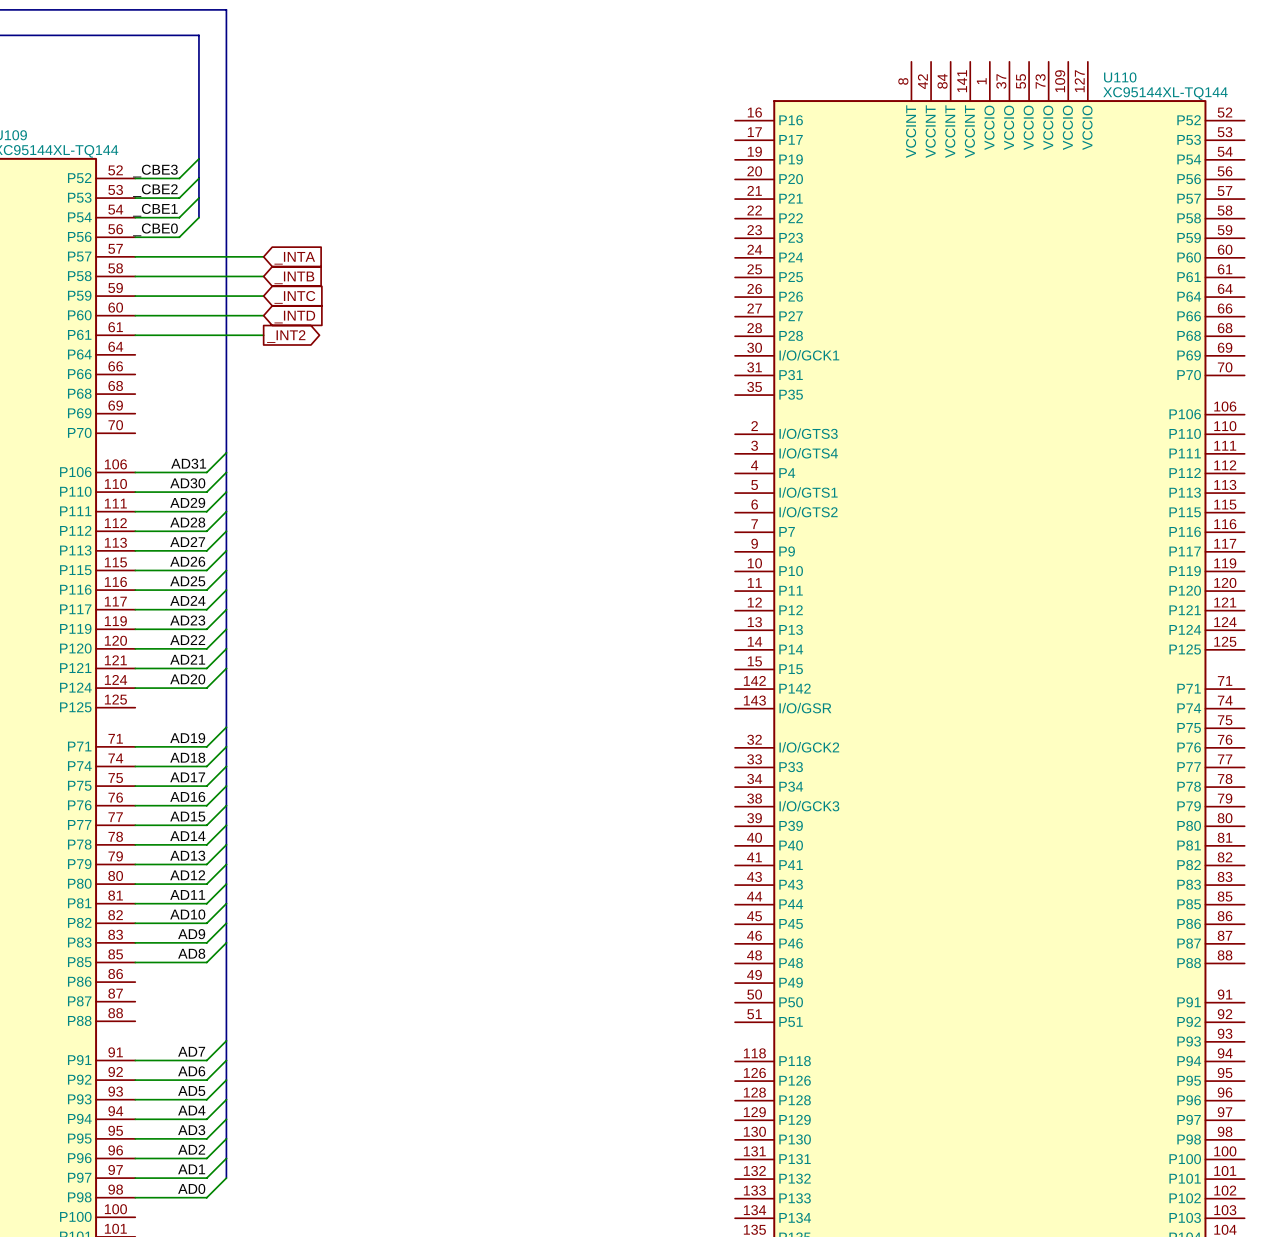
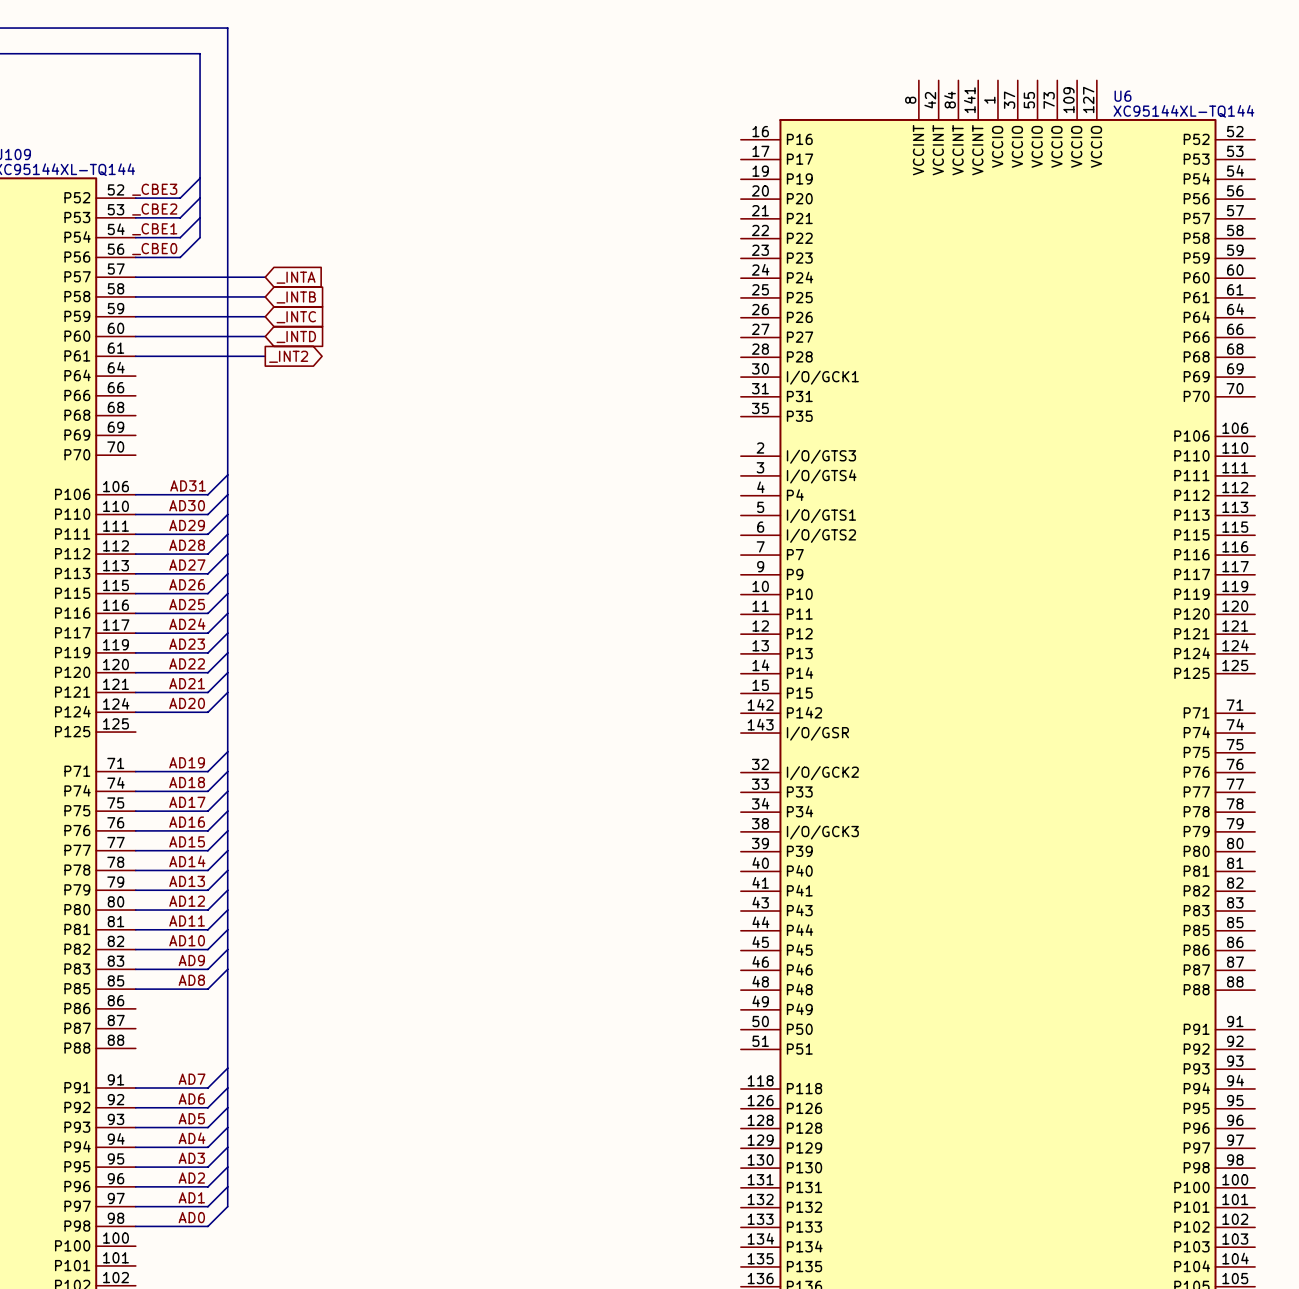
U110 name: U110 (1120, 77) -> U6 (1122, 96)

